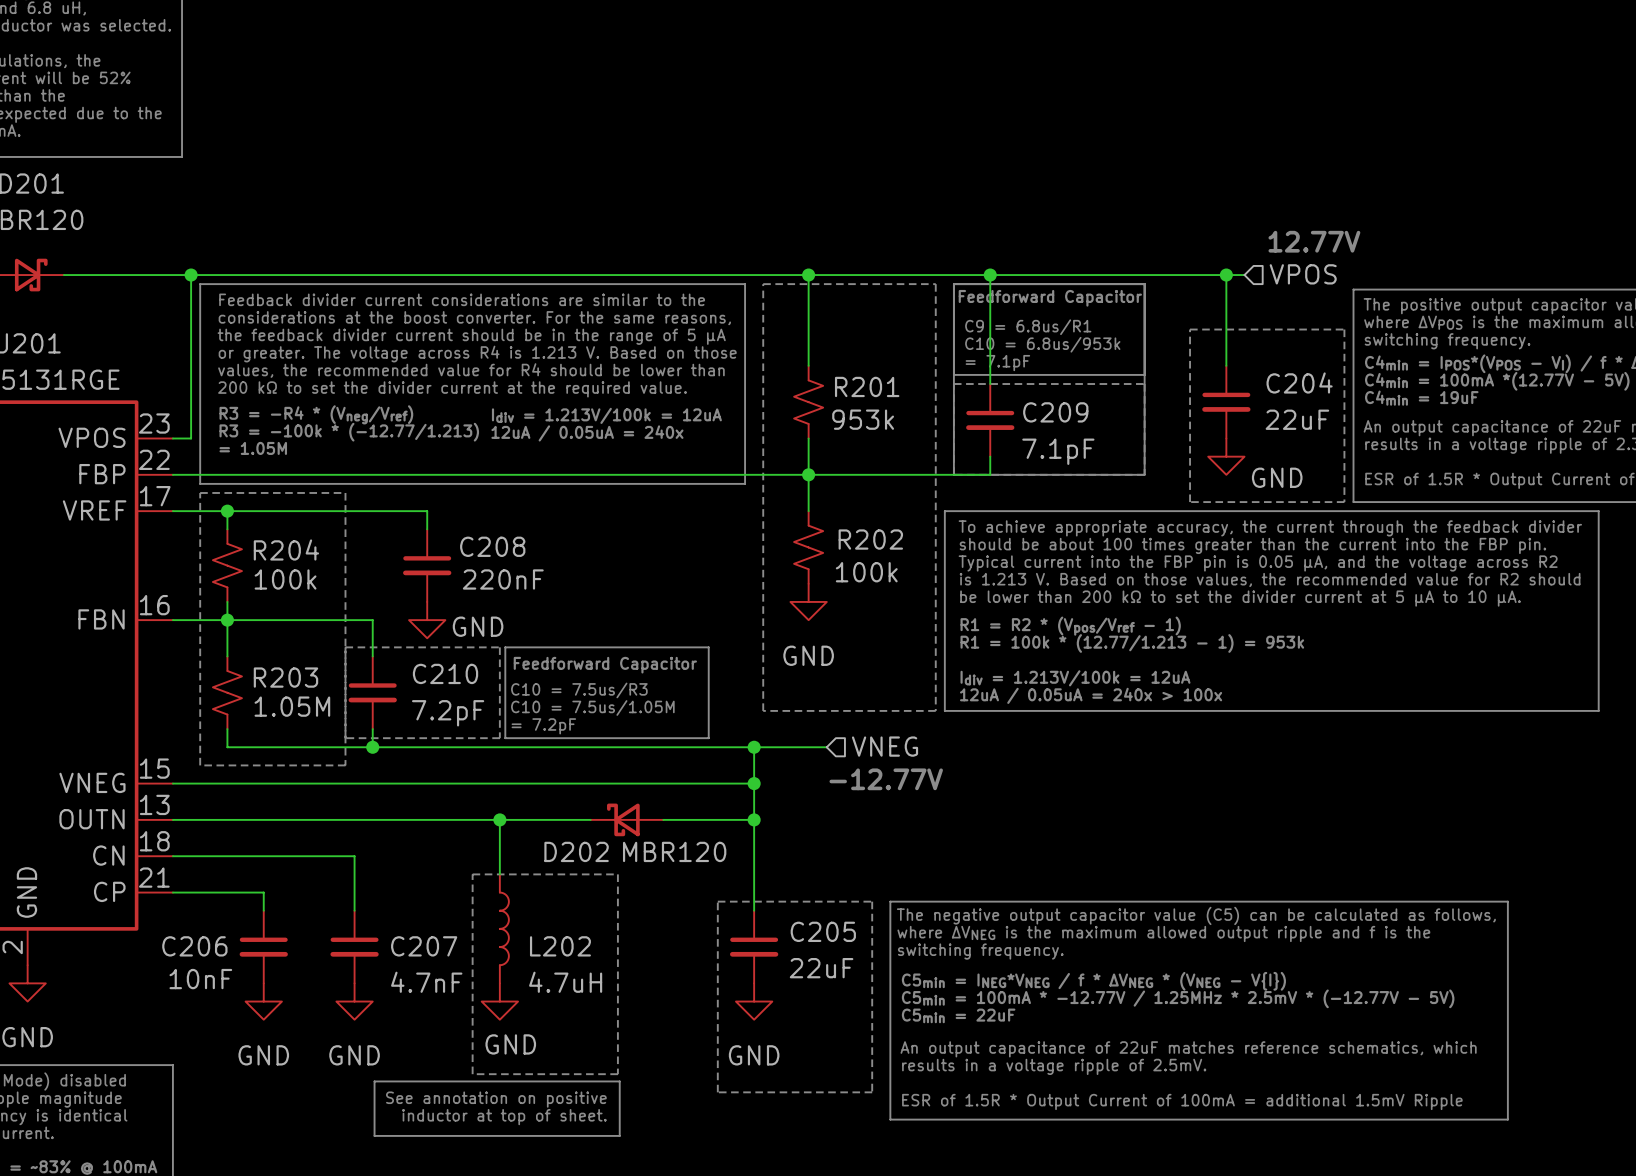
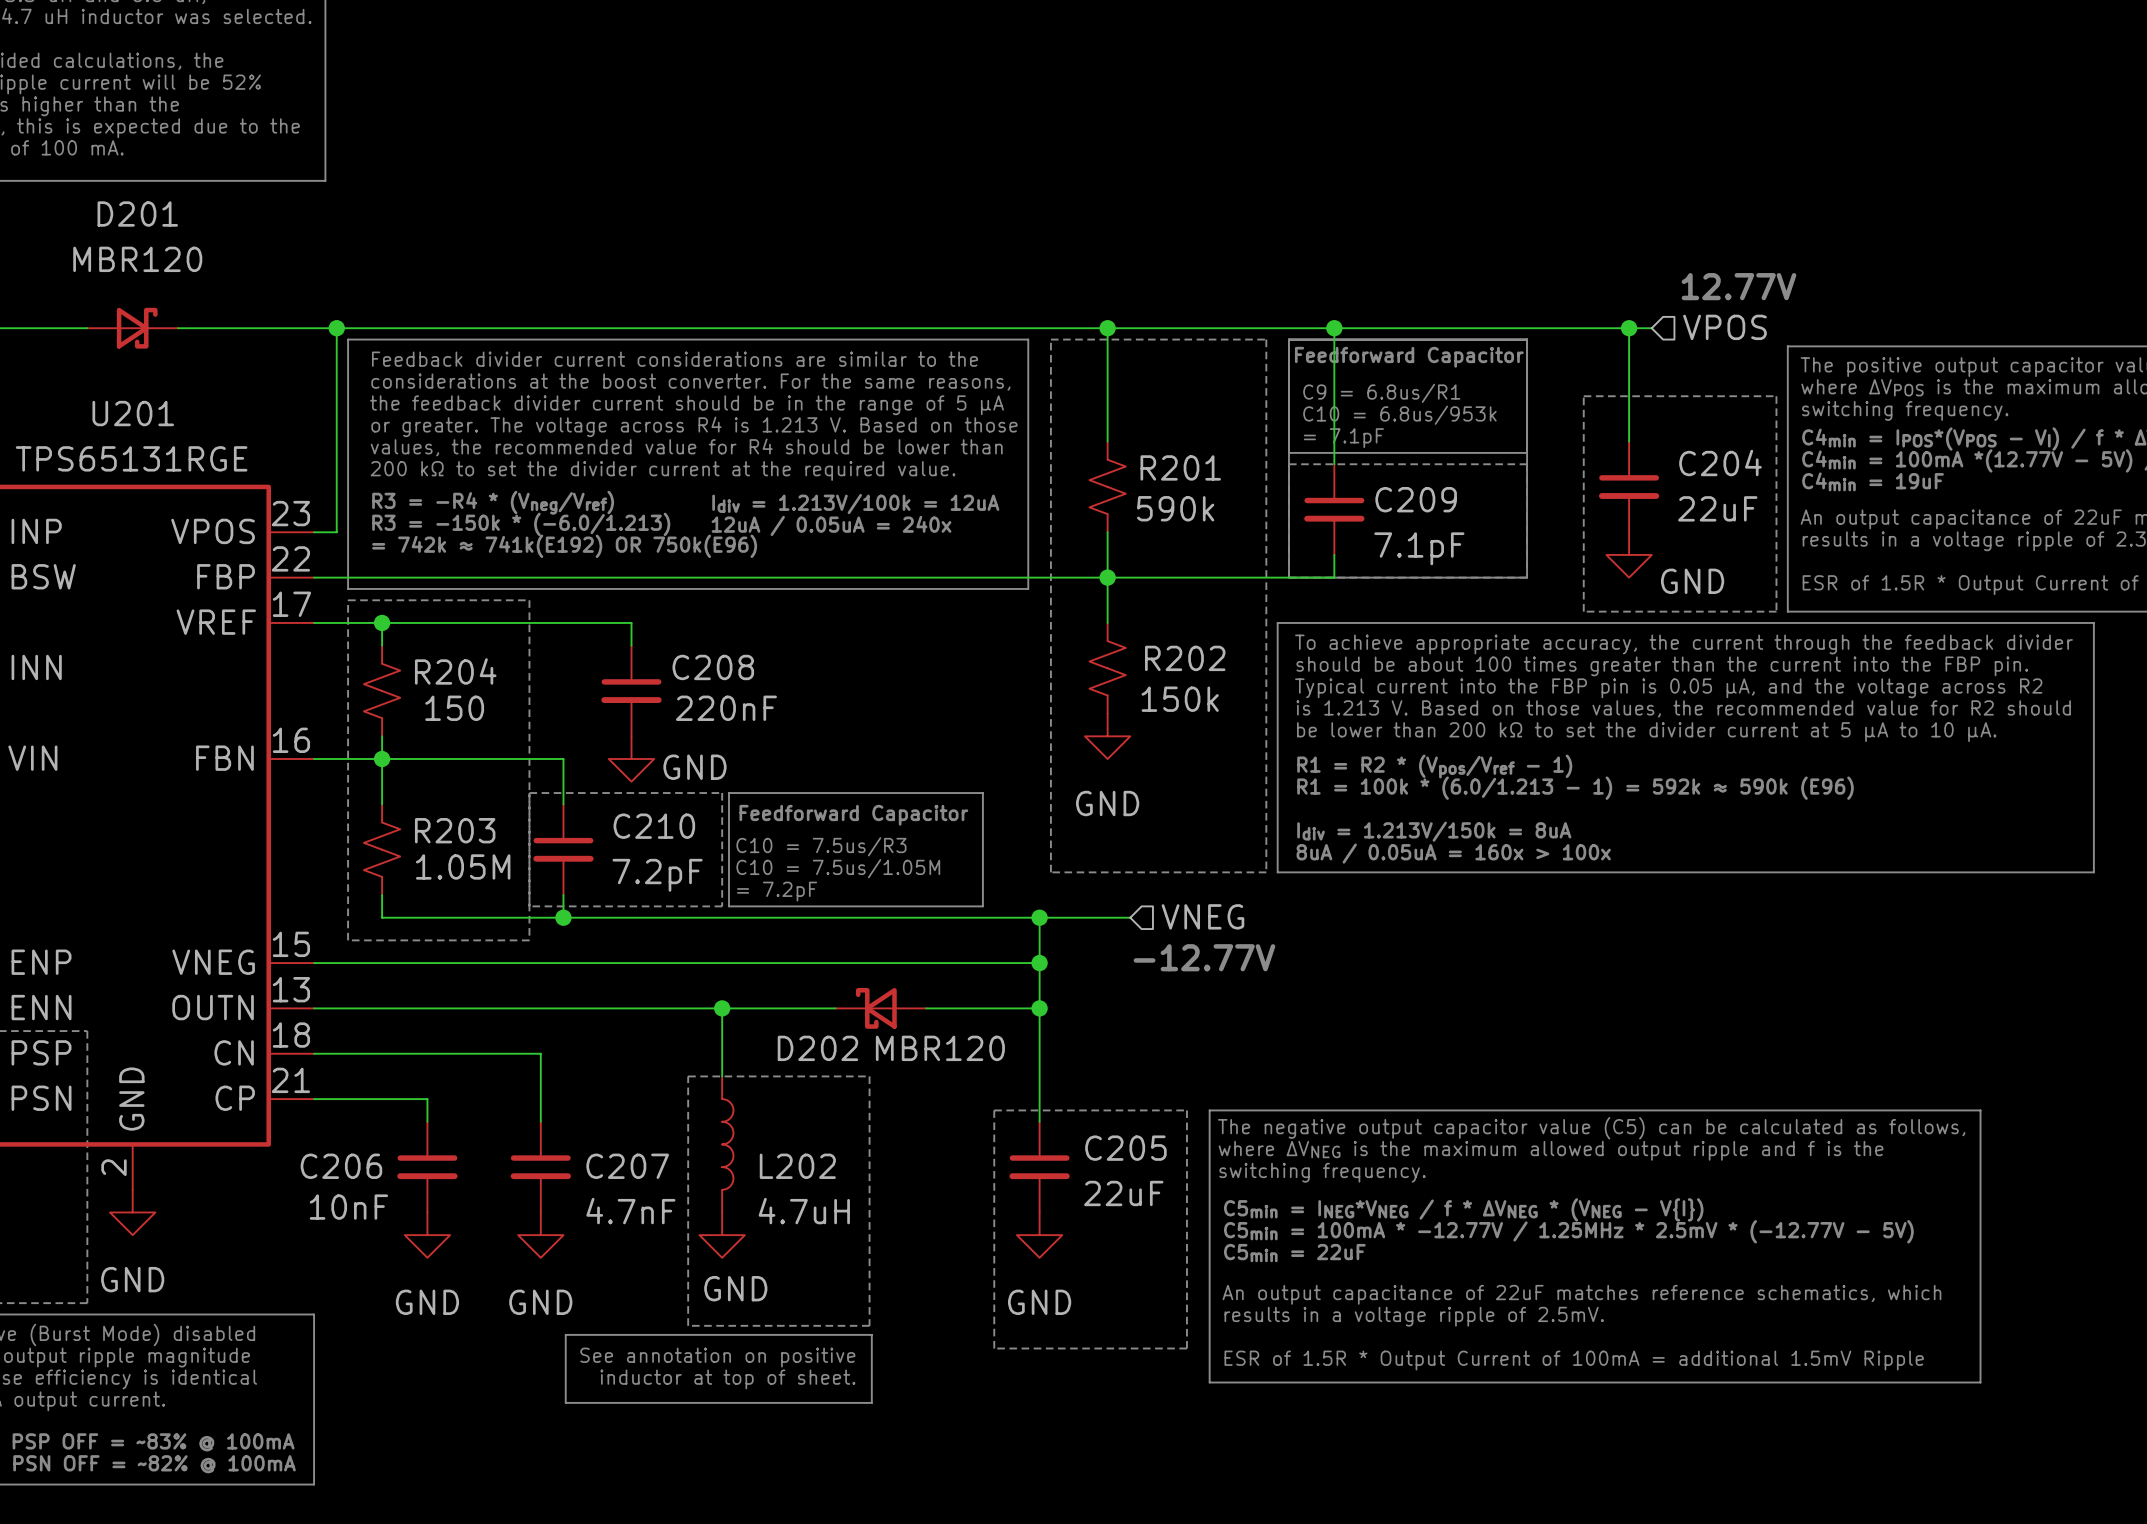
R201 value: 953k (863, 419) -> 590k (1175, 508)
text: R3 = -100k * (-12.77/1.213) (349, 432) -> R3 = -150k * (-6.0/1.213) (521, 524)
text: = 1.05M (253, 448) -> = 742k ≈ 741k(E192) OR 750k(E96) (564, 546)
R202 value: 100k (866, 572) -> 150k (1180, 699)
R204 value: 100k (285, 579) -> 150 (454, 708)
text: R1 = 100k * (12.77/1.213 - 1) = 953k (1132, 643) -> R1 = 100k * (6.0/1.213 - 1) = 592k ≈ 590k (E96) (1575, 788)
text: Idiv = 1.213V/100k = 12uA (1075, 678) -> Idiv = 1.213V/150k = 8uA (1434, 831)
text: 12uA / 0.05uA = 240x > 100x (1091, 695) -> 8uA / 0.05uA = 160x > 100x (1453, 853)

